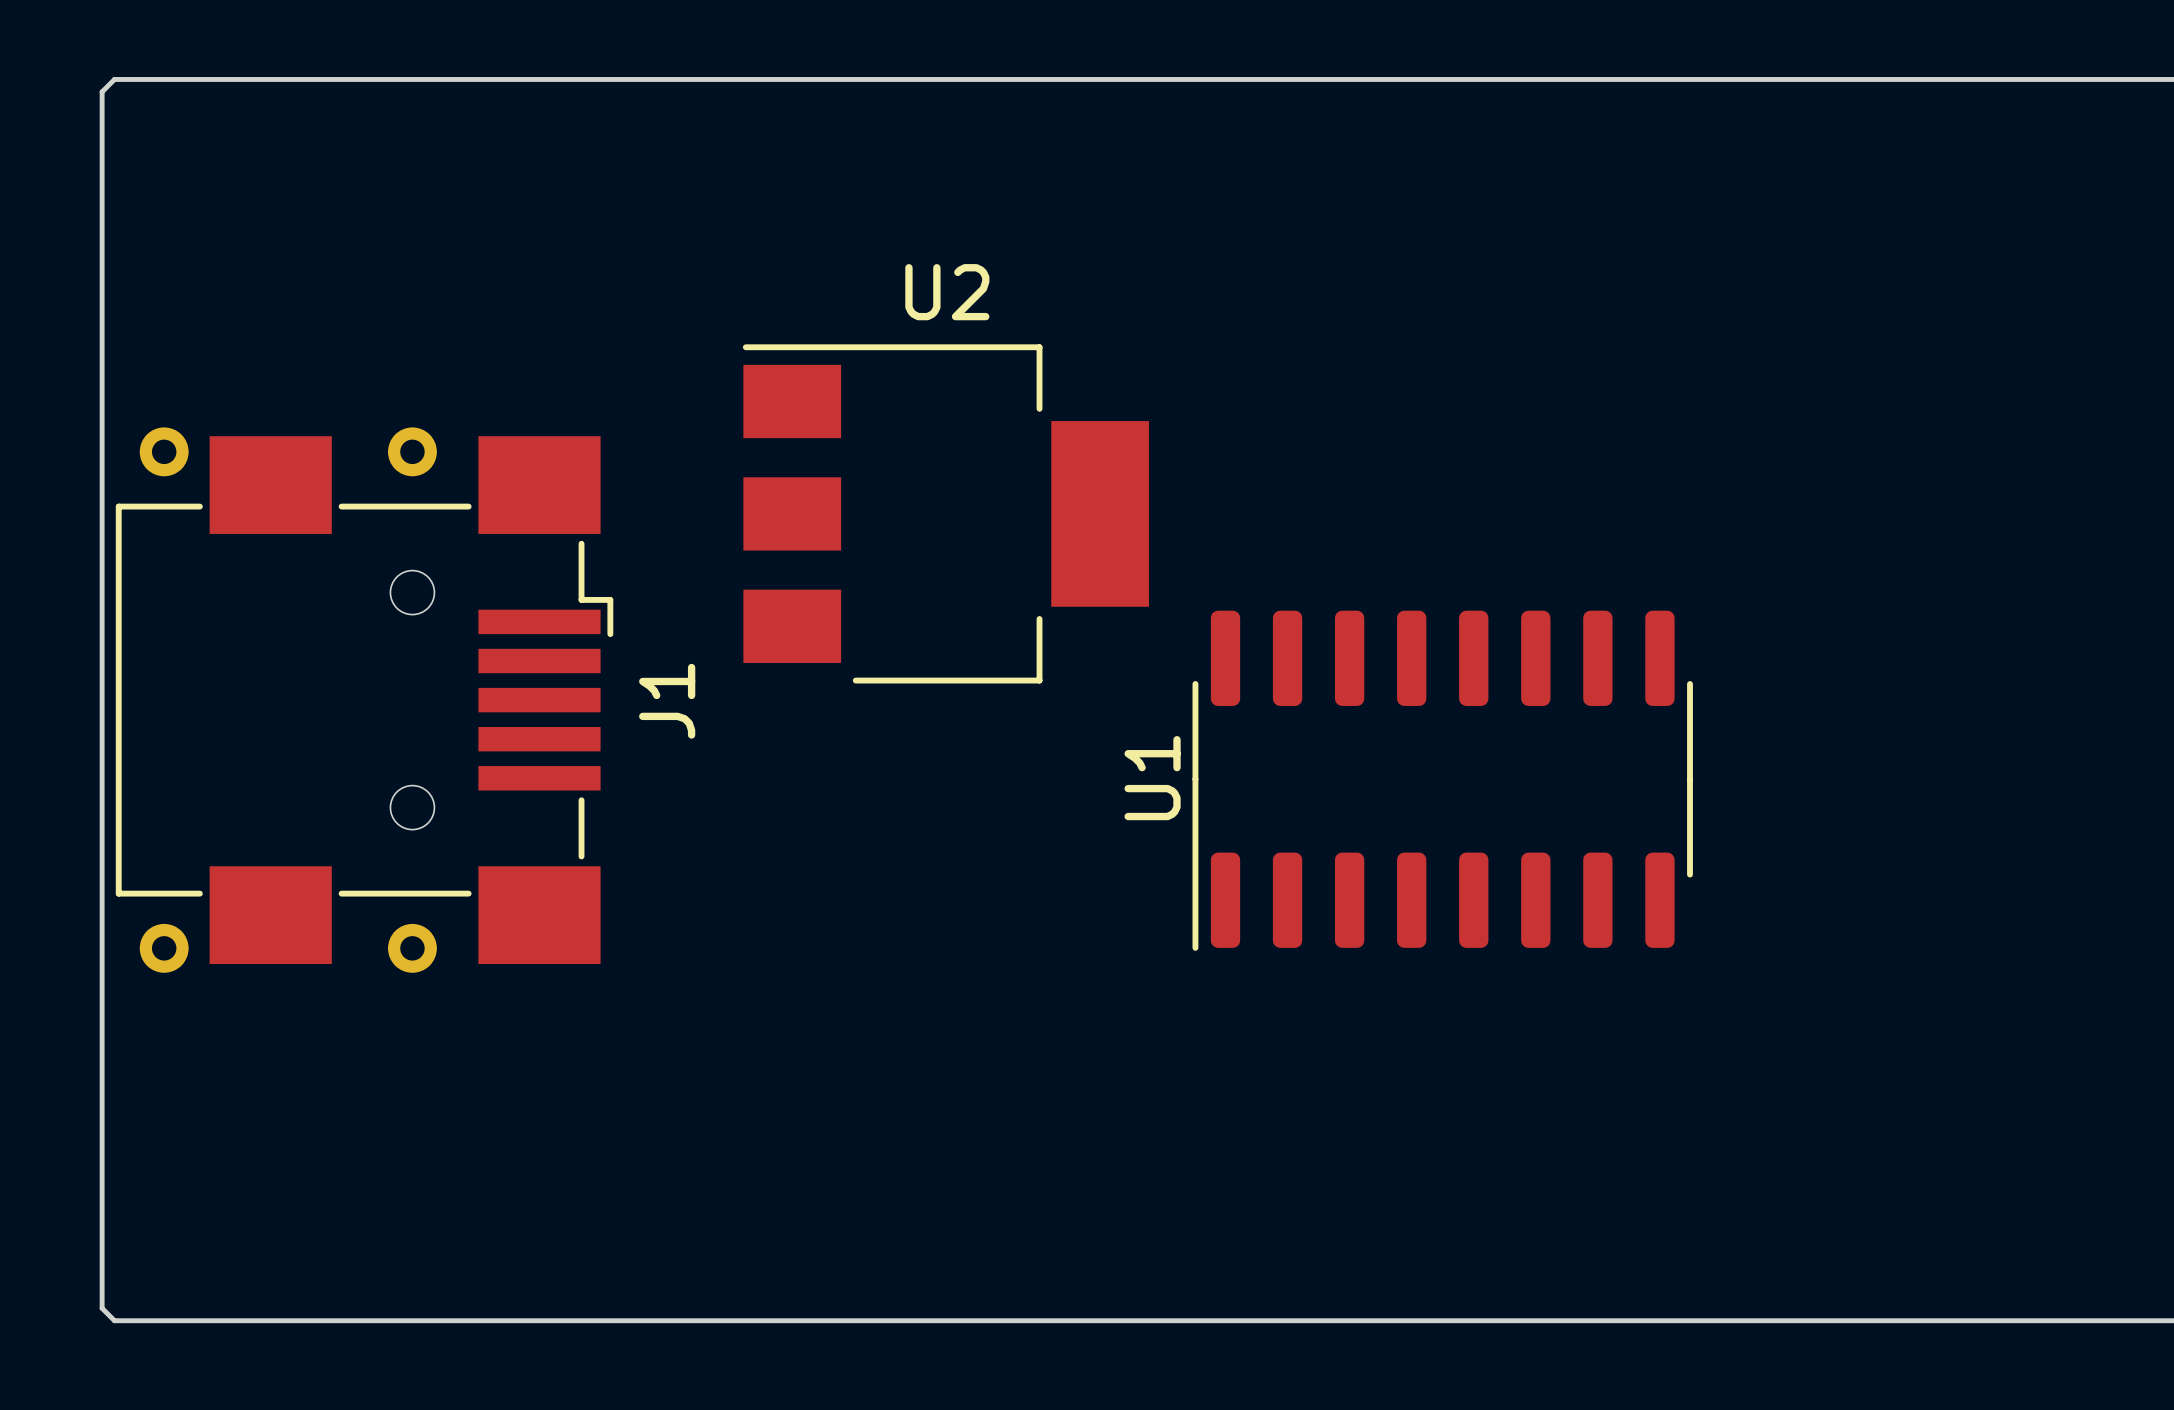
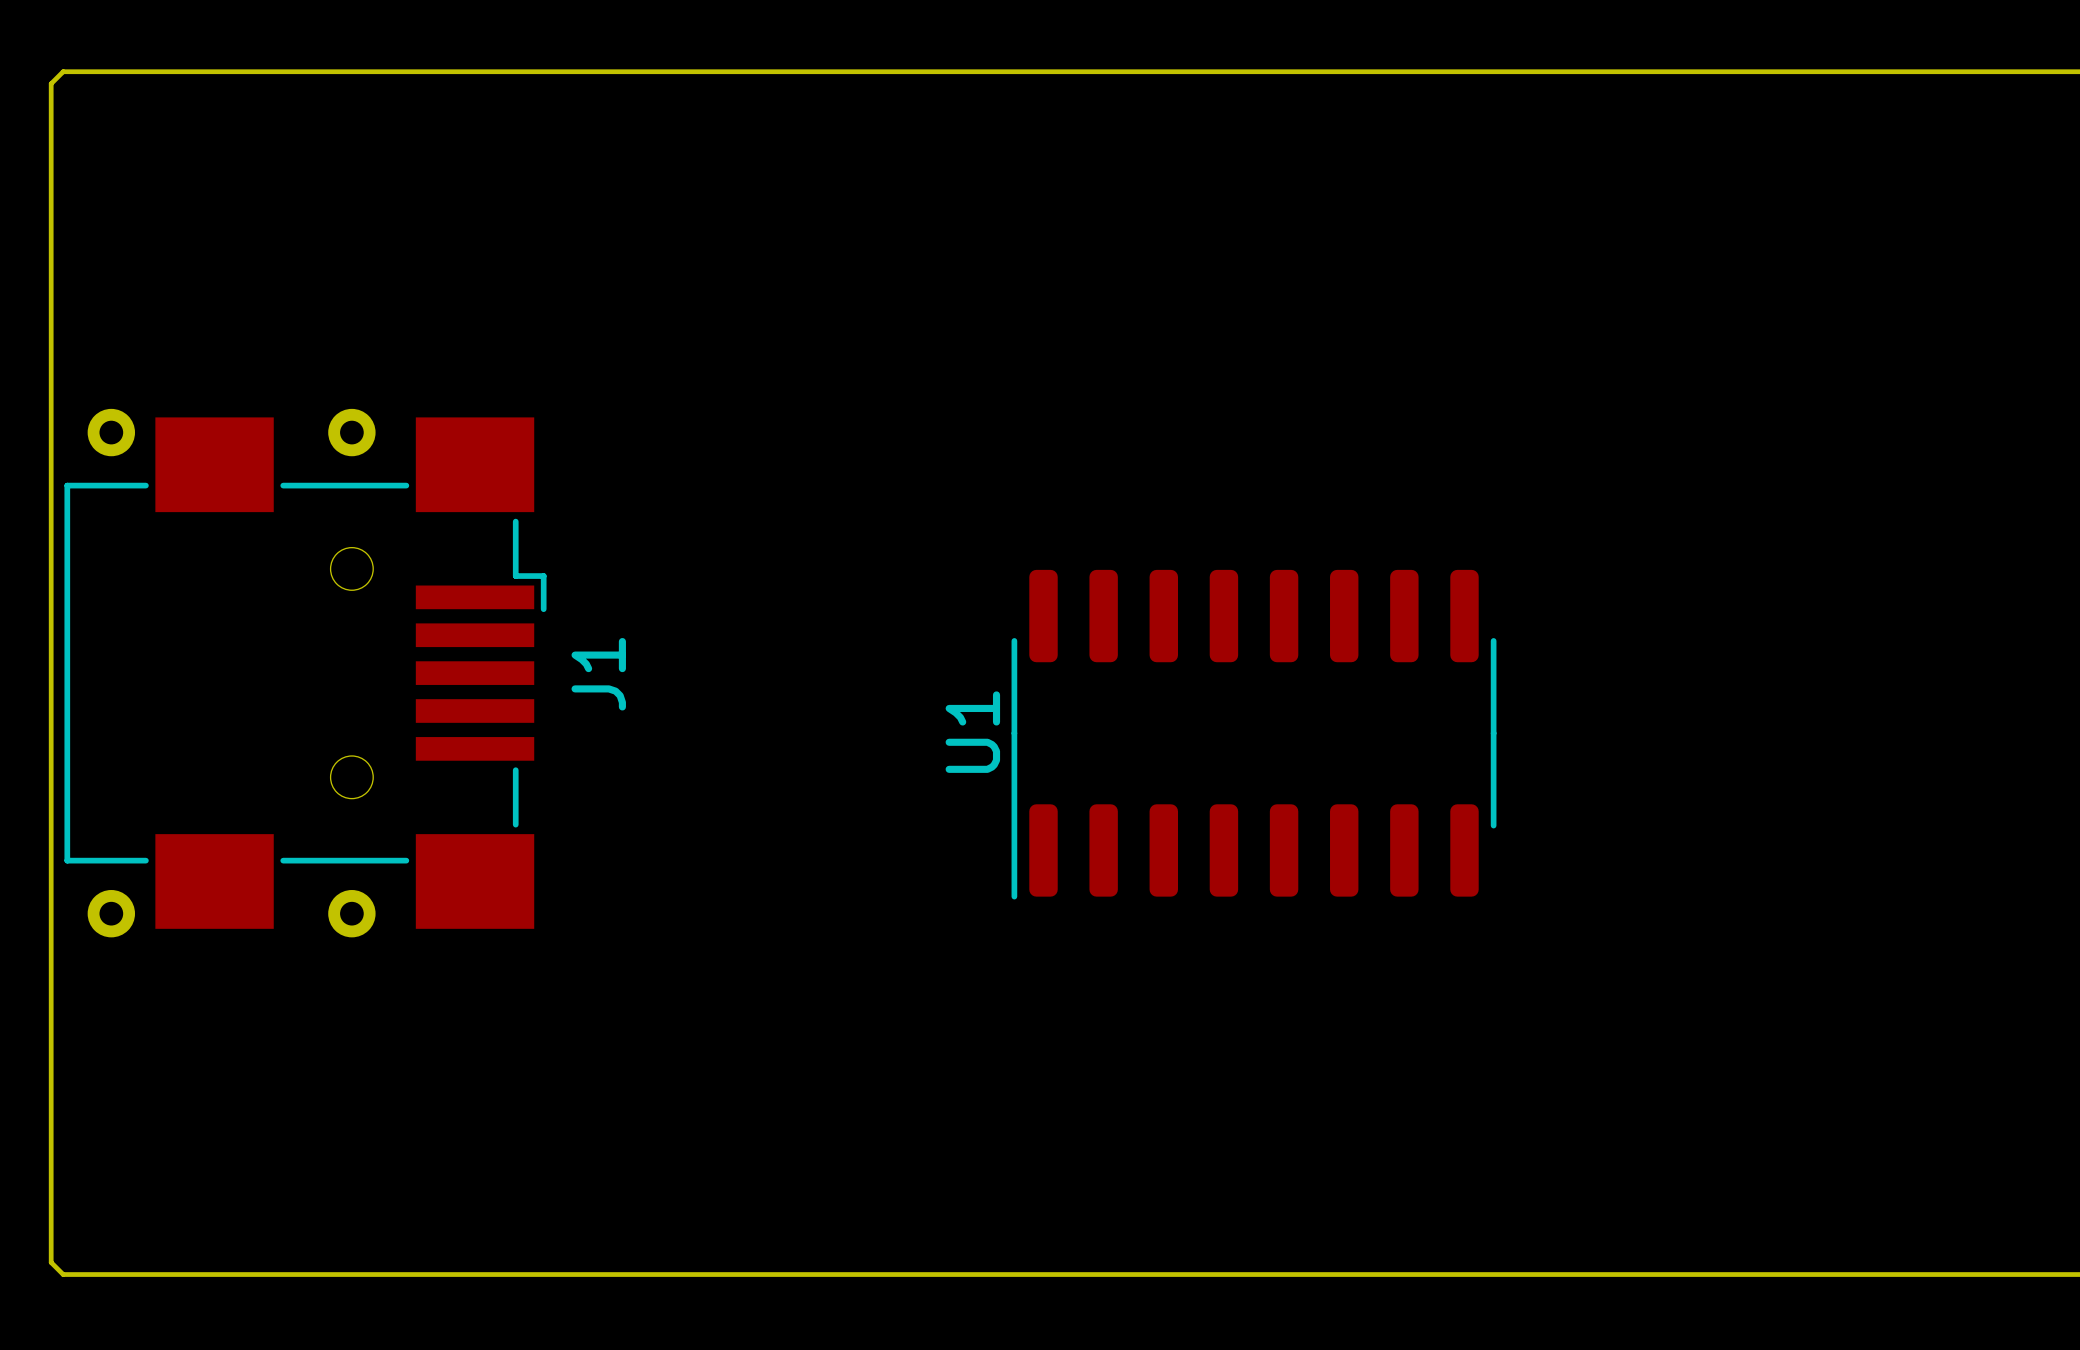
U2: (945, 513) -> none
U1 position: (1442, 780) -> (1254, 734)

